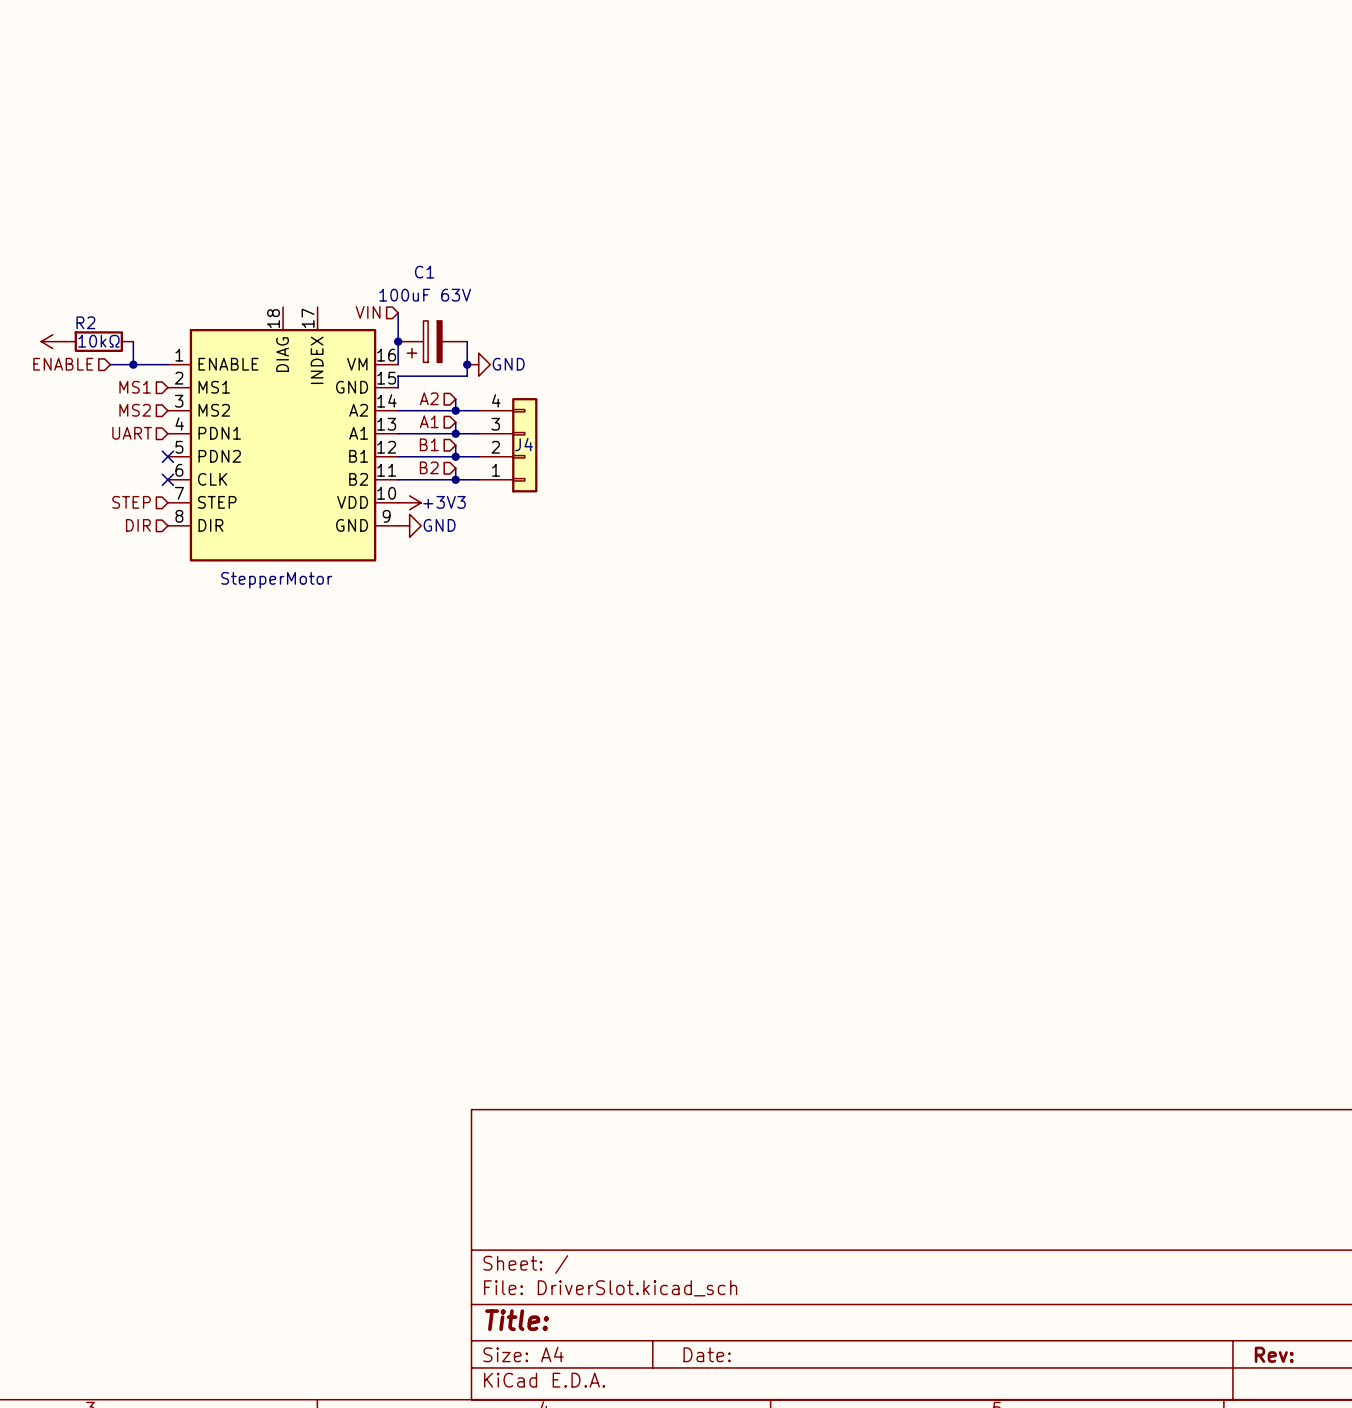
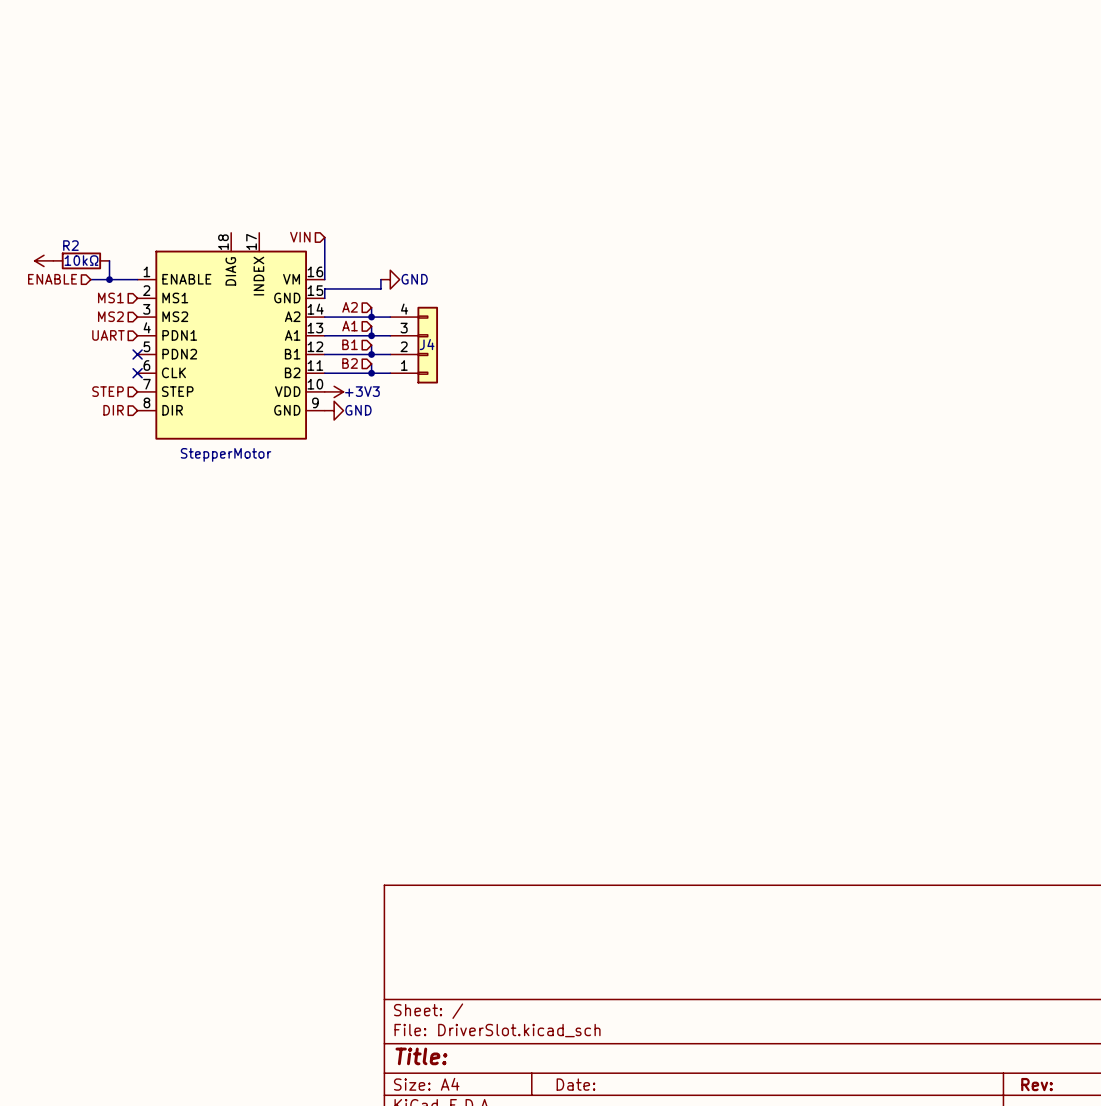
junction: (398, 341) -> none
C1: 100uF 63V (432, 341) -> none
wire: (467, 341) (467, 364) -> none
junction: (467, 364) -> none

